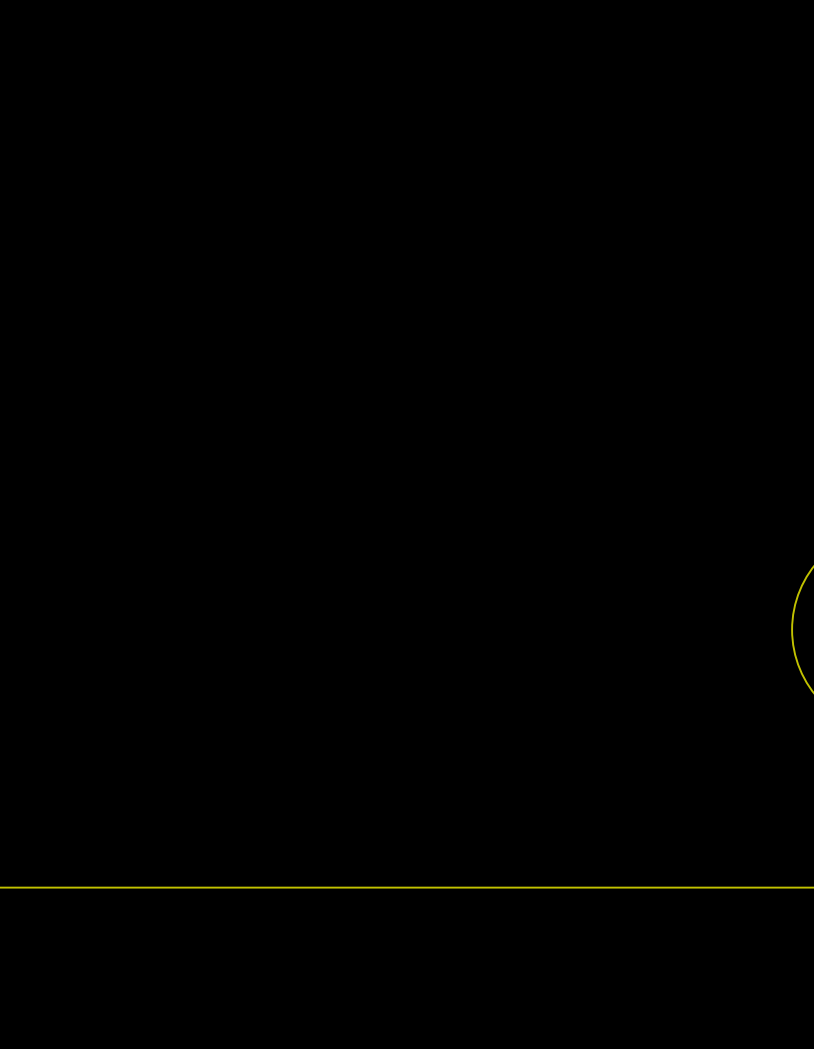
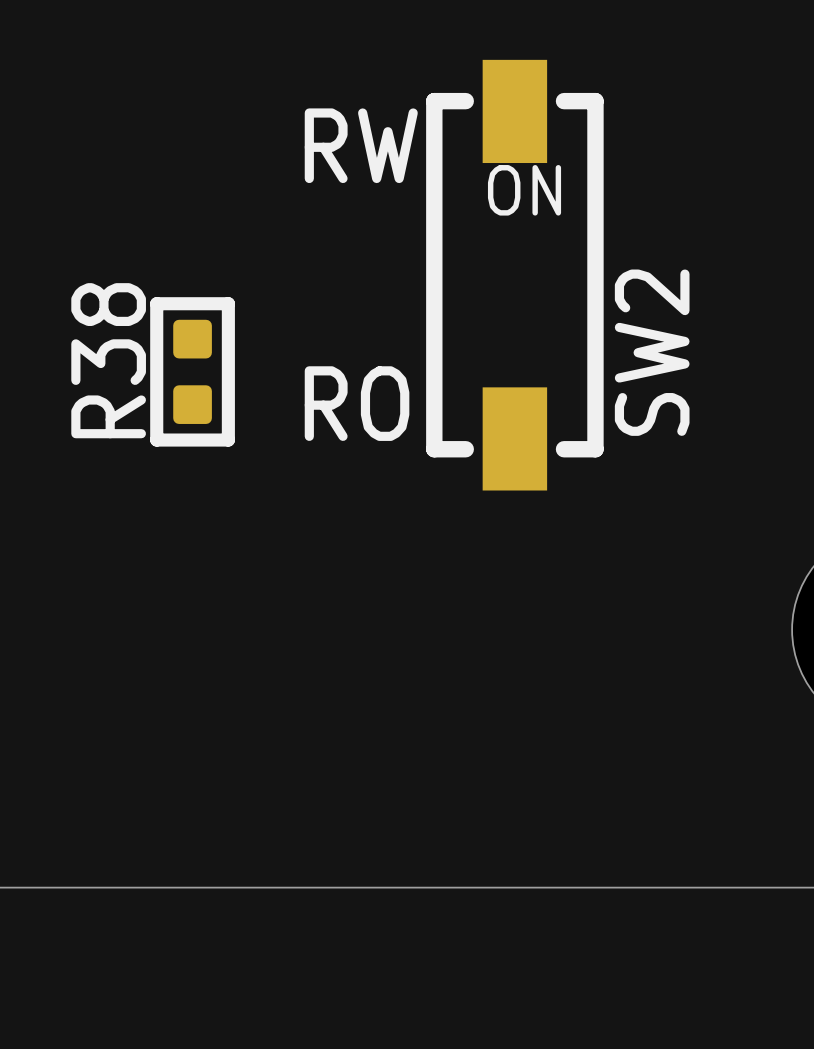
text: none -> RW (361, 145)
SW2: none -> (514, 275)
R38: none -> (192, 371)
text: none -> RO (357, 403)

